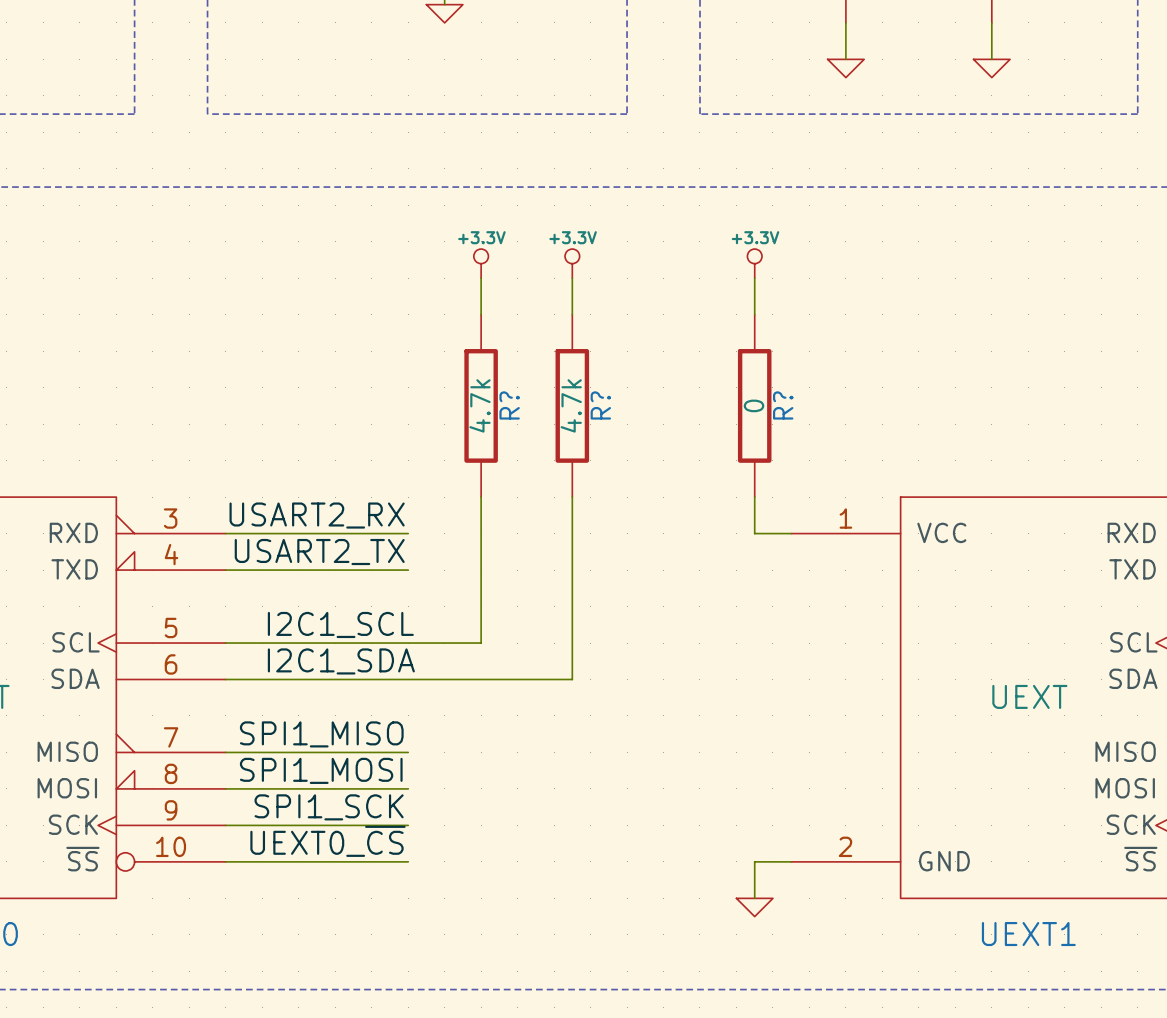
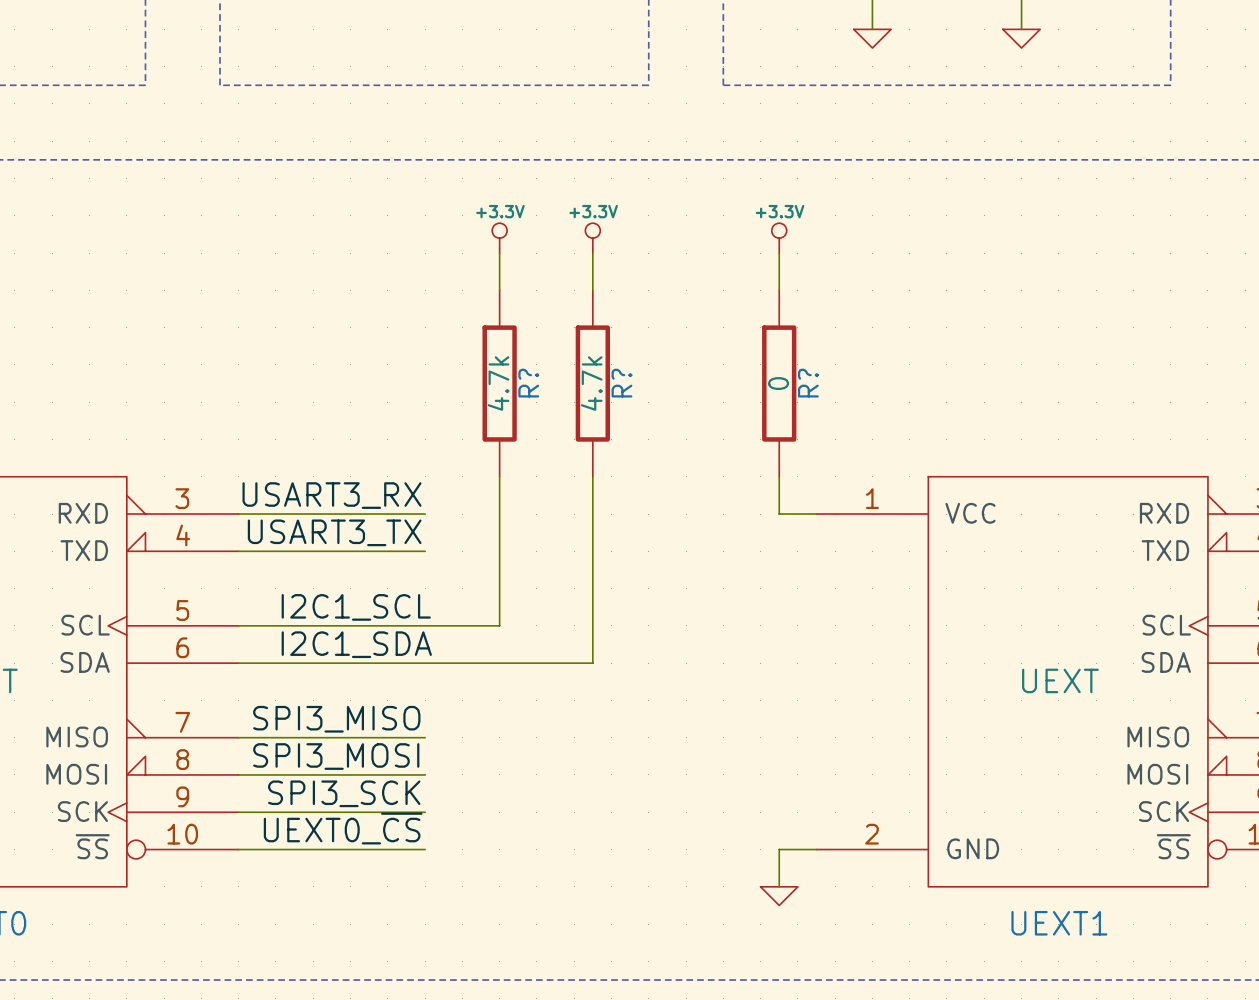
label: USART2_RX (317, 515) -> USART3_RX (331, 495)
label: USART2_TX (319, 552) -> USART3_TX (334, 532)
label: SPI1_MISO (321, 734) -> SPI3_MISO (336, 719)
label: SPI1_MOSI (321, 770) -> SPI3_MOSI (336, 756)
label: SPI1_SCK (329, 807) -> SPI3_SCK (344, 793)

